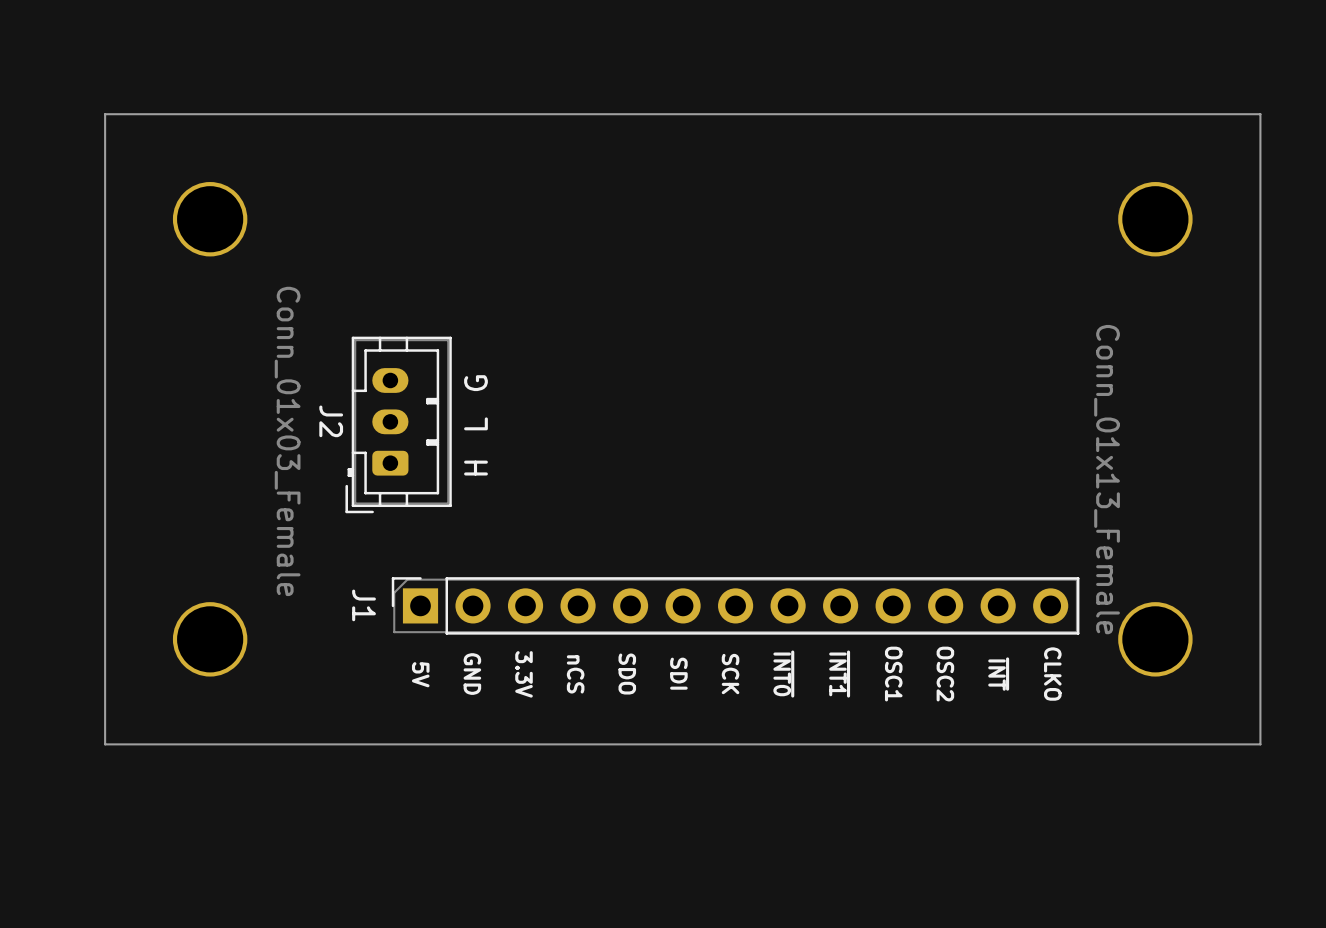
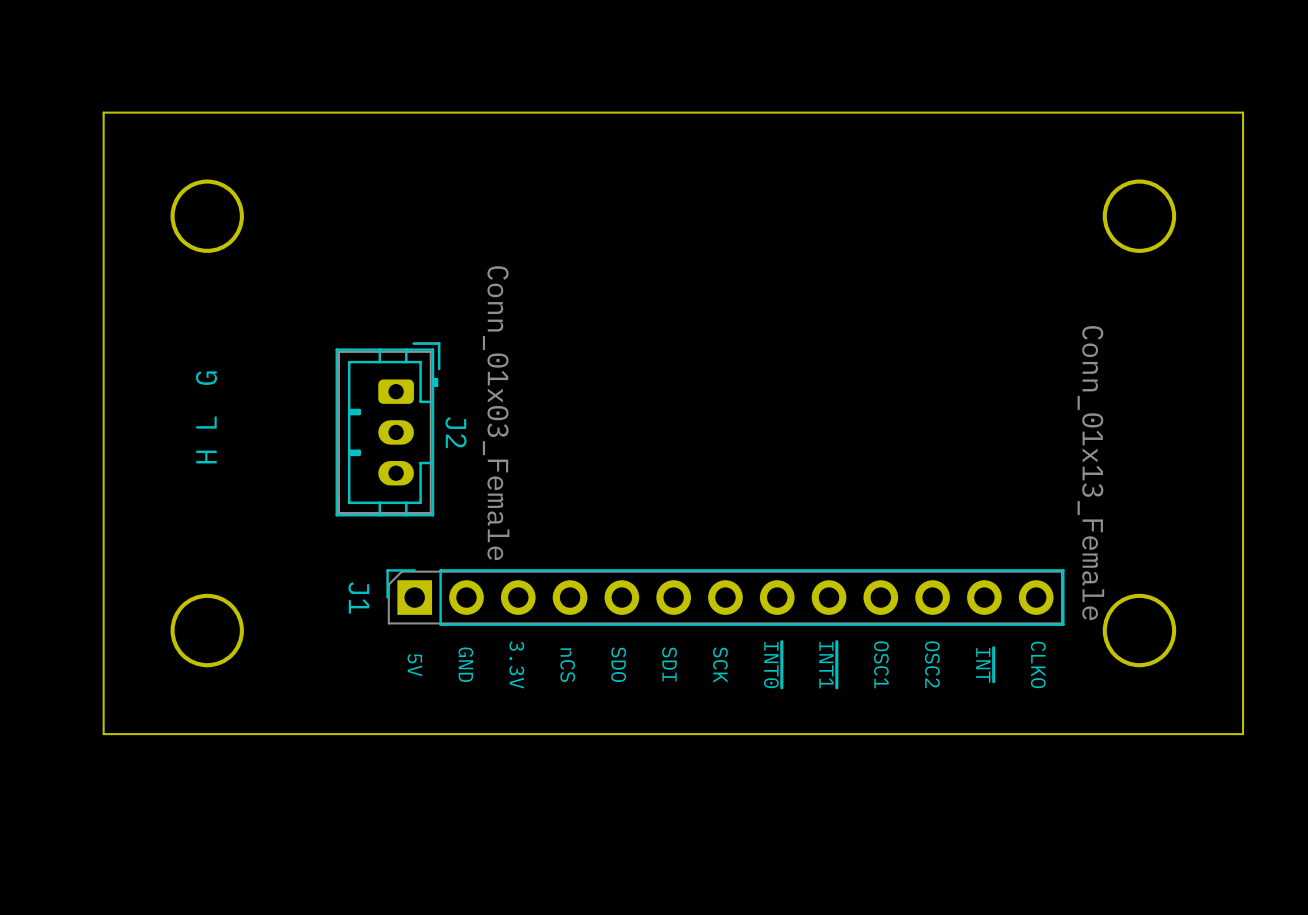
text position: G (475, 383) -> G (206, 378)
text position: L (475, 423) -> L (206, 422)
J2 rotation: 0° (398, 424) -> 180° (387, 429)
text position: H (475, 468) -> H (206, 457)

